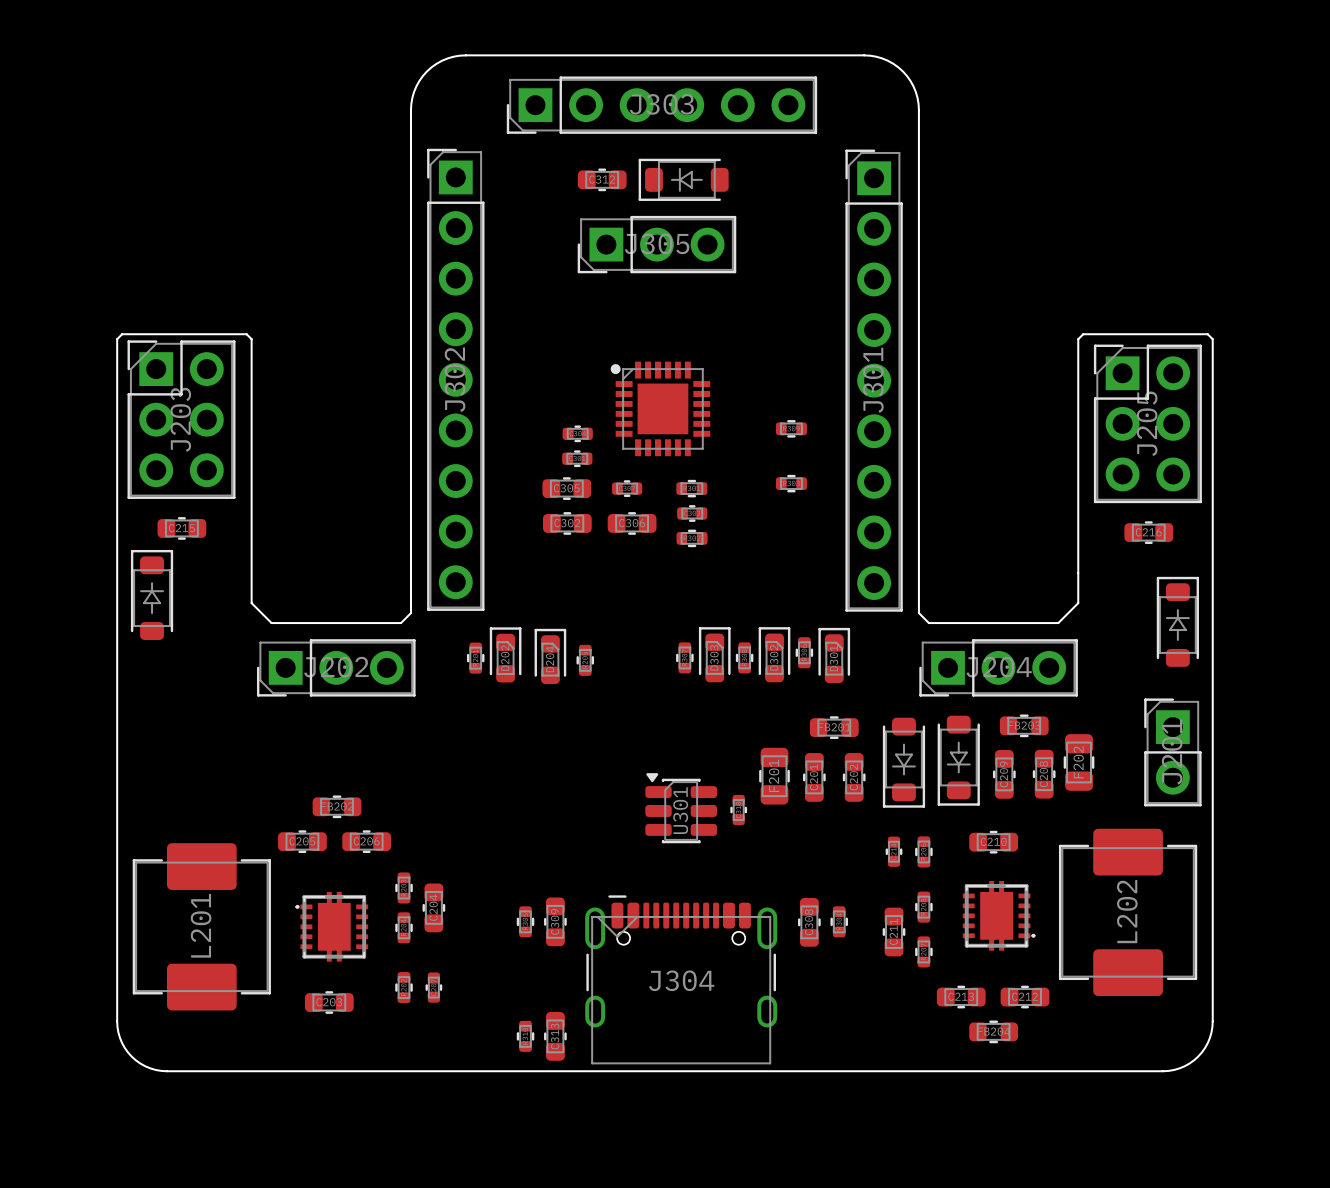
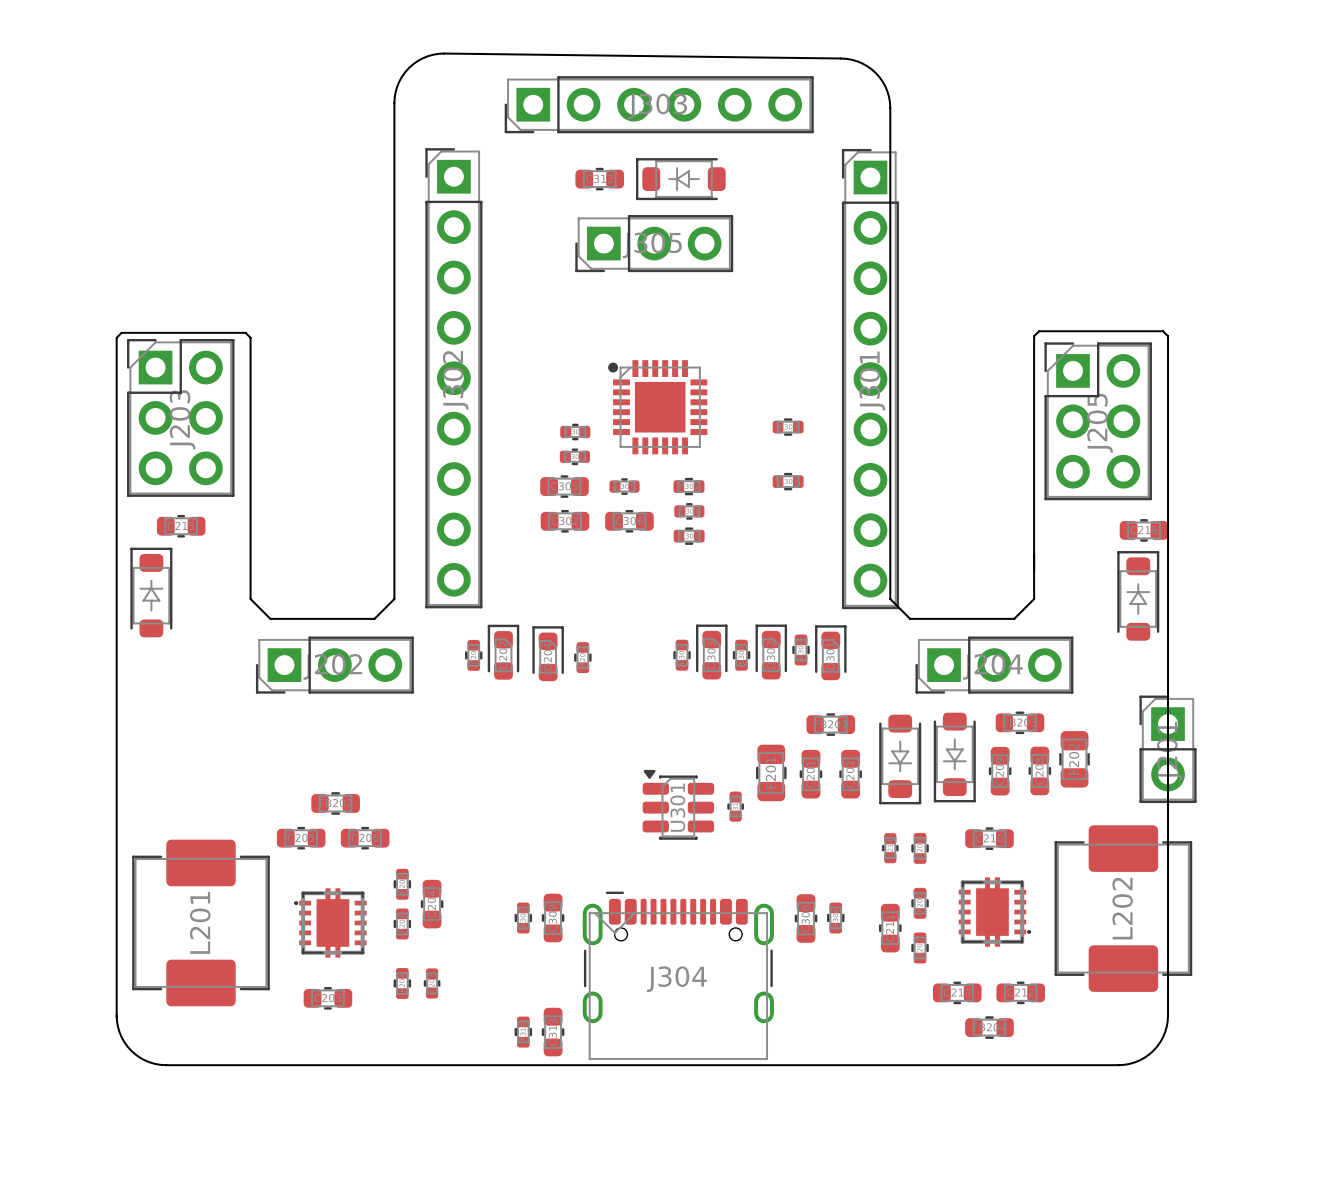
J205 position: (1147, 423) -> (1098, 421)
board edge: (251, 601) (271, 623) (401, 623) (410, 613) (410, 110) (416, 86) (431, 67) (447, 58) (465, 55) (864, 55) (887, 60) (898, 67) (910, 80) (918, 104) (918, 613) (928, 623) (1058, 623) (1078, 603) (1078, 339) (1083, 334) (1207, 334) (1212, 339) (1212, 1021) (1209, 1037) (1205, 1047) (1193, 1060) (1179, 1068) (1162, 1071) (166, 1071) (145, 1066) (131, 1056) (122, 1043) (117, 1021) -> (250, 599) (270, 618) (374, 618) (394, 599) (394, 103) (399, 81) (413, 64) (427, 56) (443, 53) (840, 58) (862, 63) (879, 77) (887, 91) (889, 102) (890, 599) (910, 618) (1014, 618) (1034, 599) (1034, 336) (1039, 331) (1163, 331) (1168, 336) (1168, 1015) (1165, 1031) (1157, 1046) (1149, 1054) (1134, 1062) (1118, 1065) (166, 1065) (149, 1062) (131, 1050) (119, 1031) (116, 1015)
part position: (1177, 621) -> (1138, 595)

